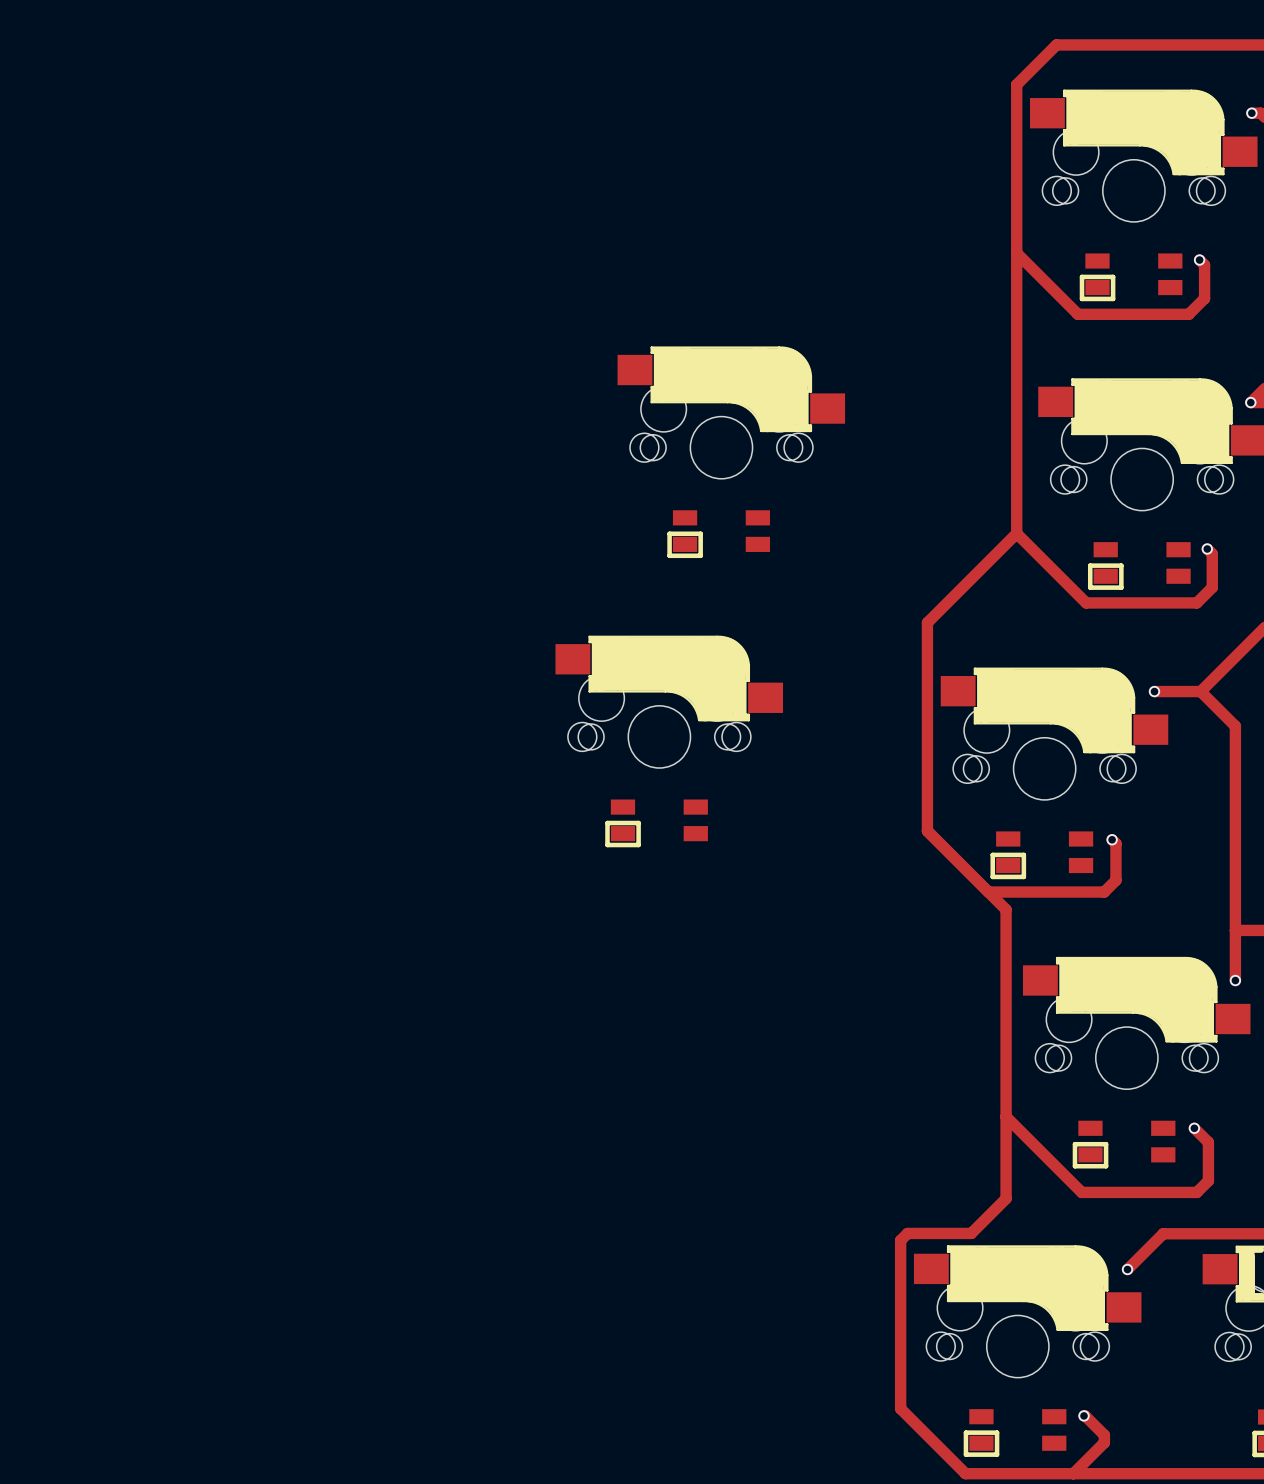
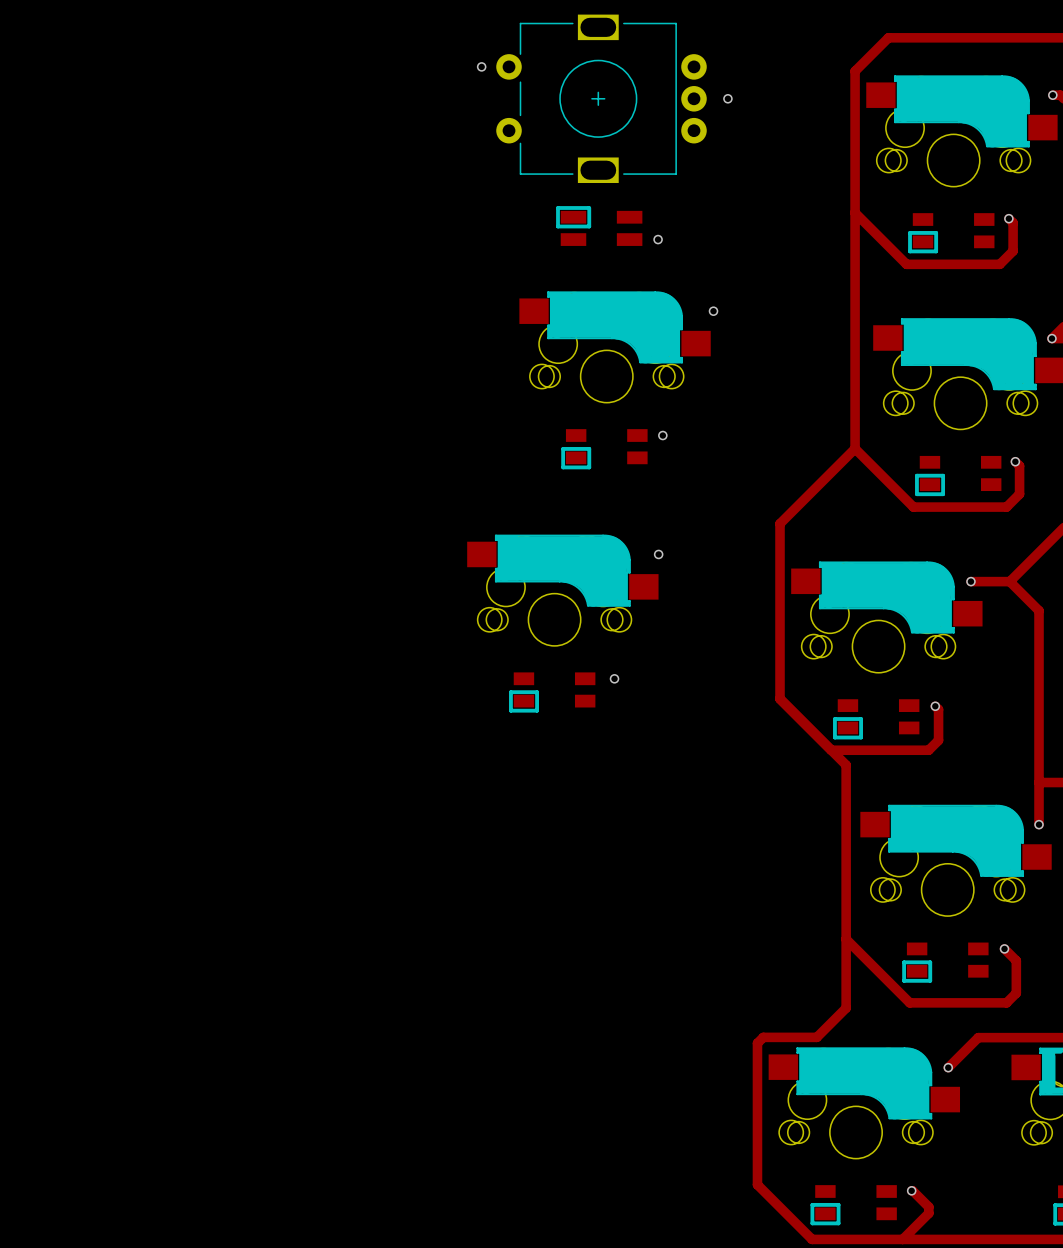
via: none -> (481, 66)
part: none -> (601, 98)
via: none -> (727, 98)
part: none -> (599, 226)
via: none -> (658, 239)
via: none -> (713, 311)
via: none -> (662, 435)
via: none -> (658, 554)
via: none -> (614, 678)

